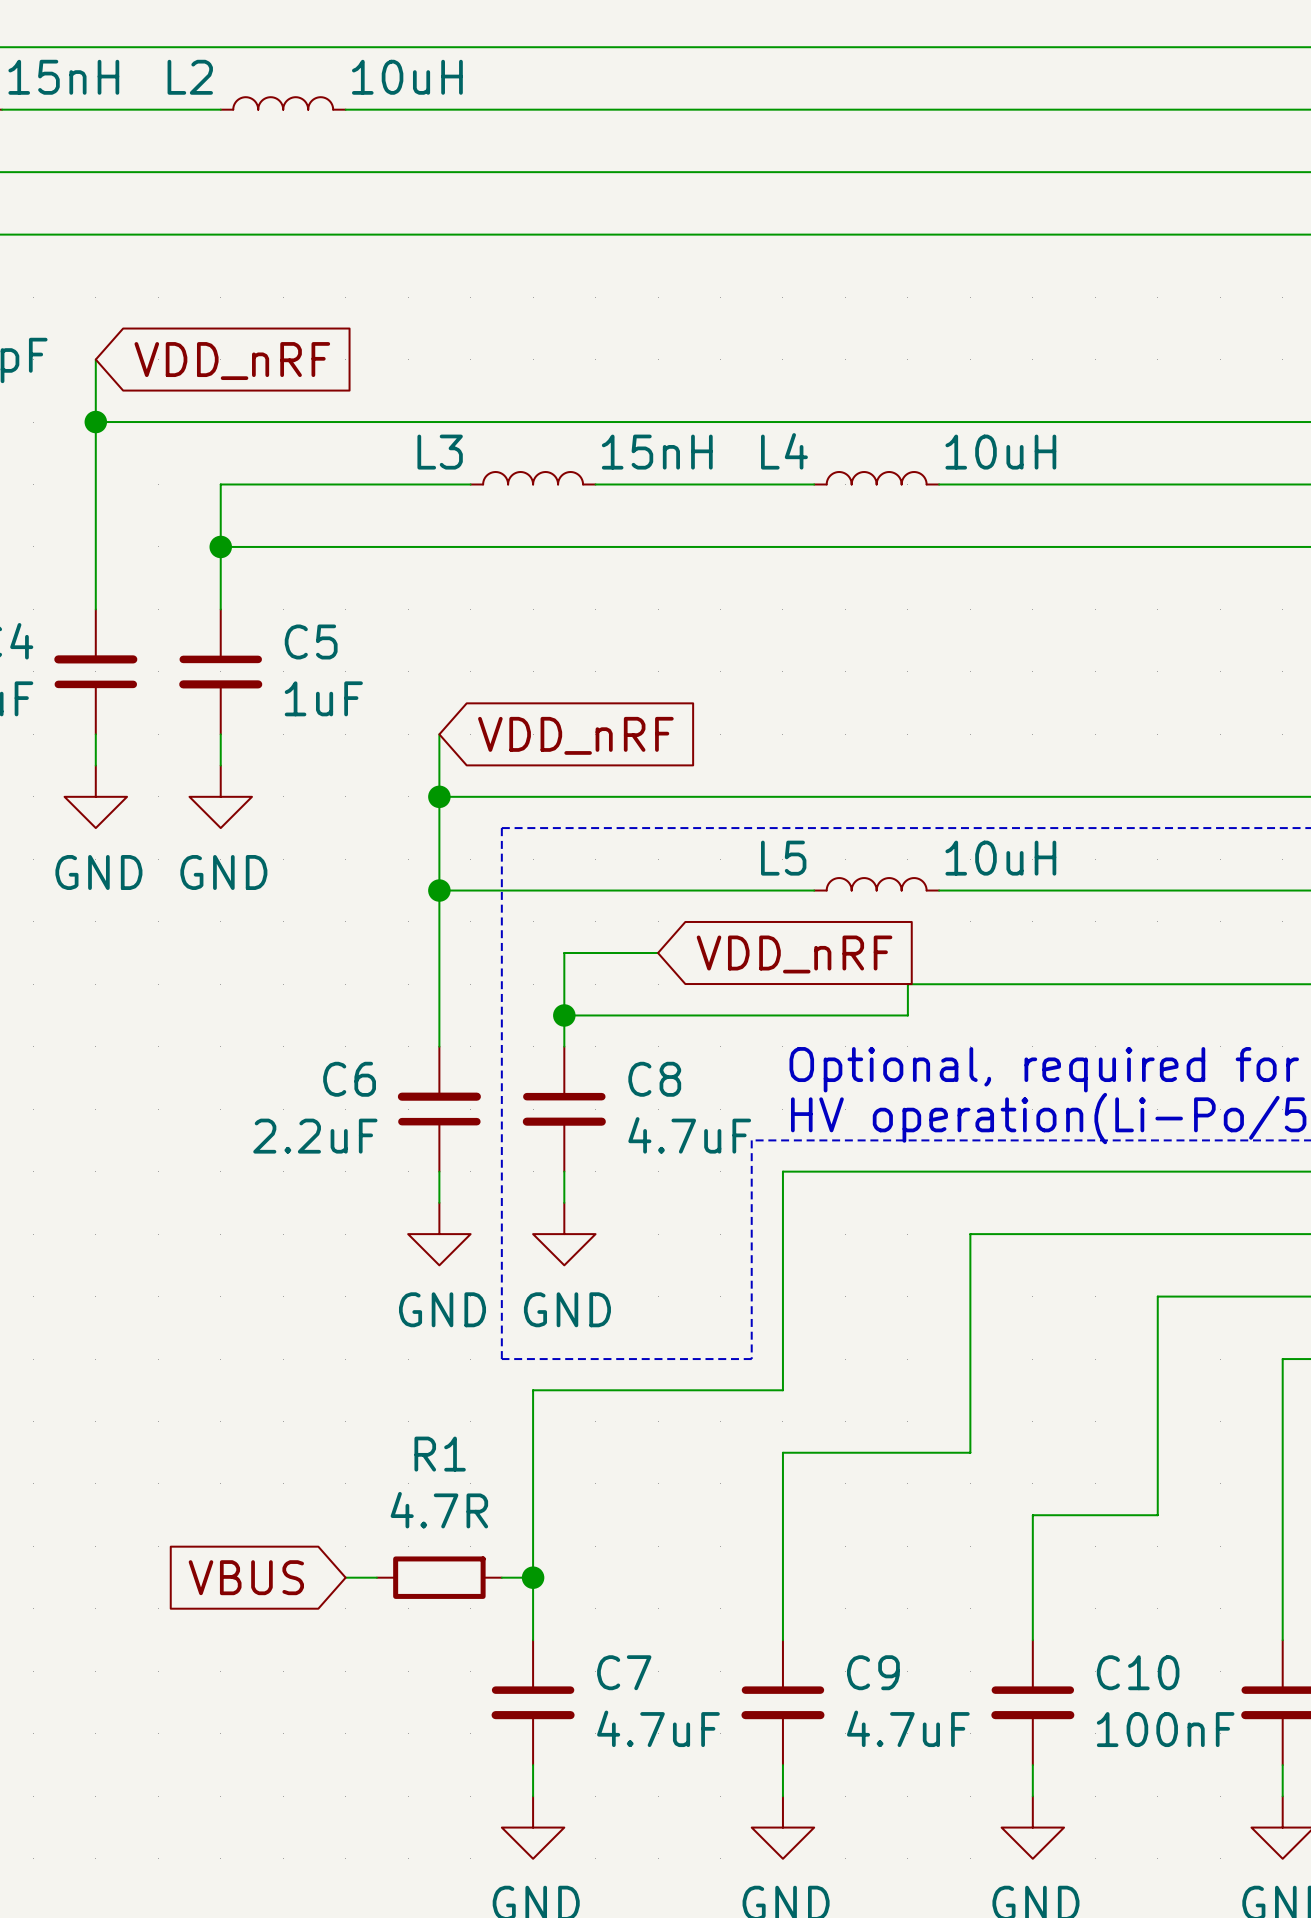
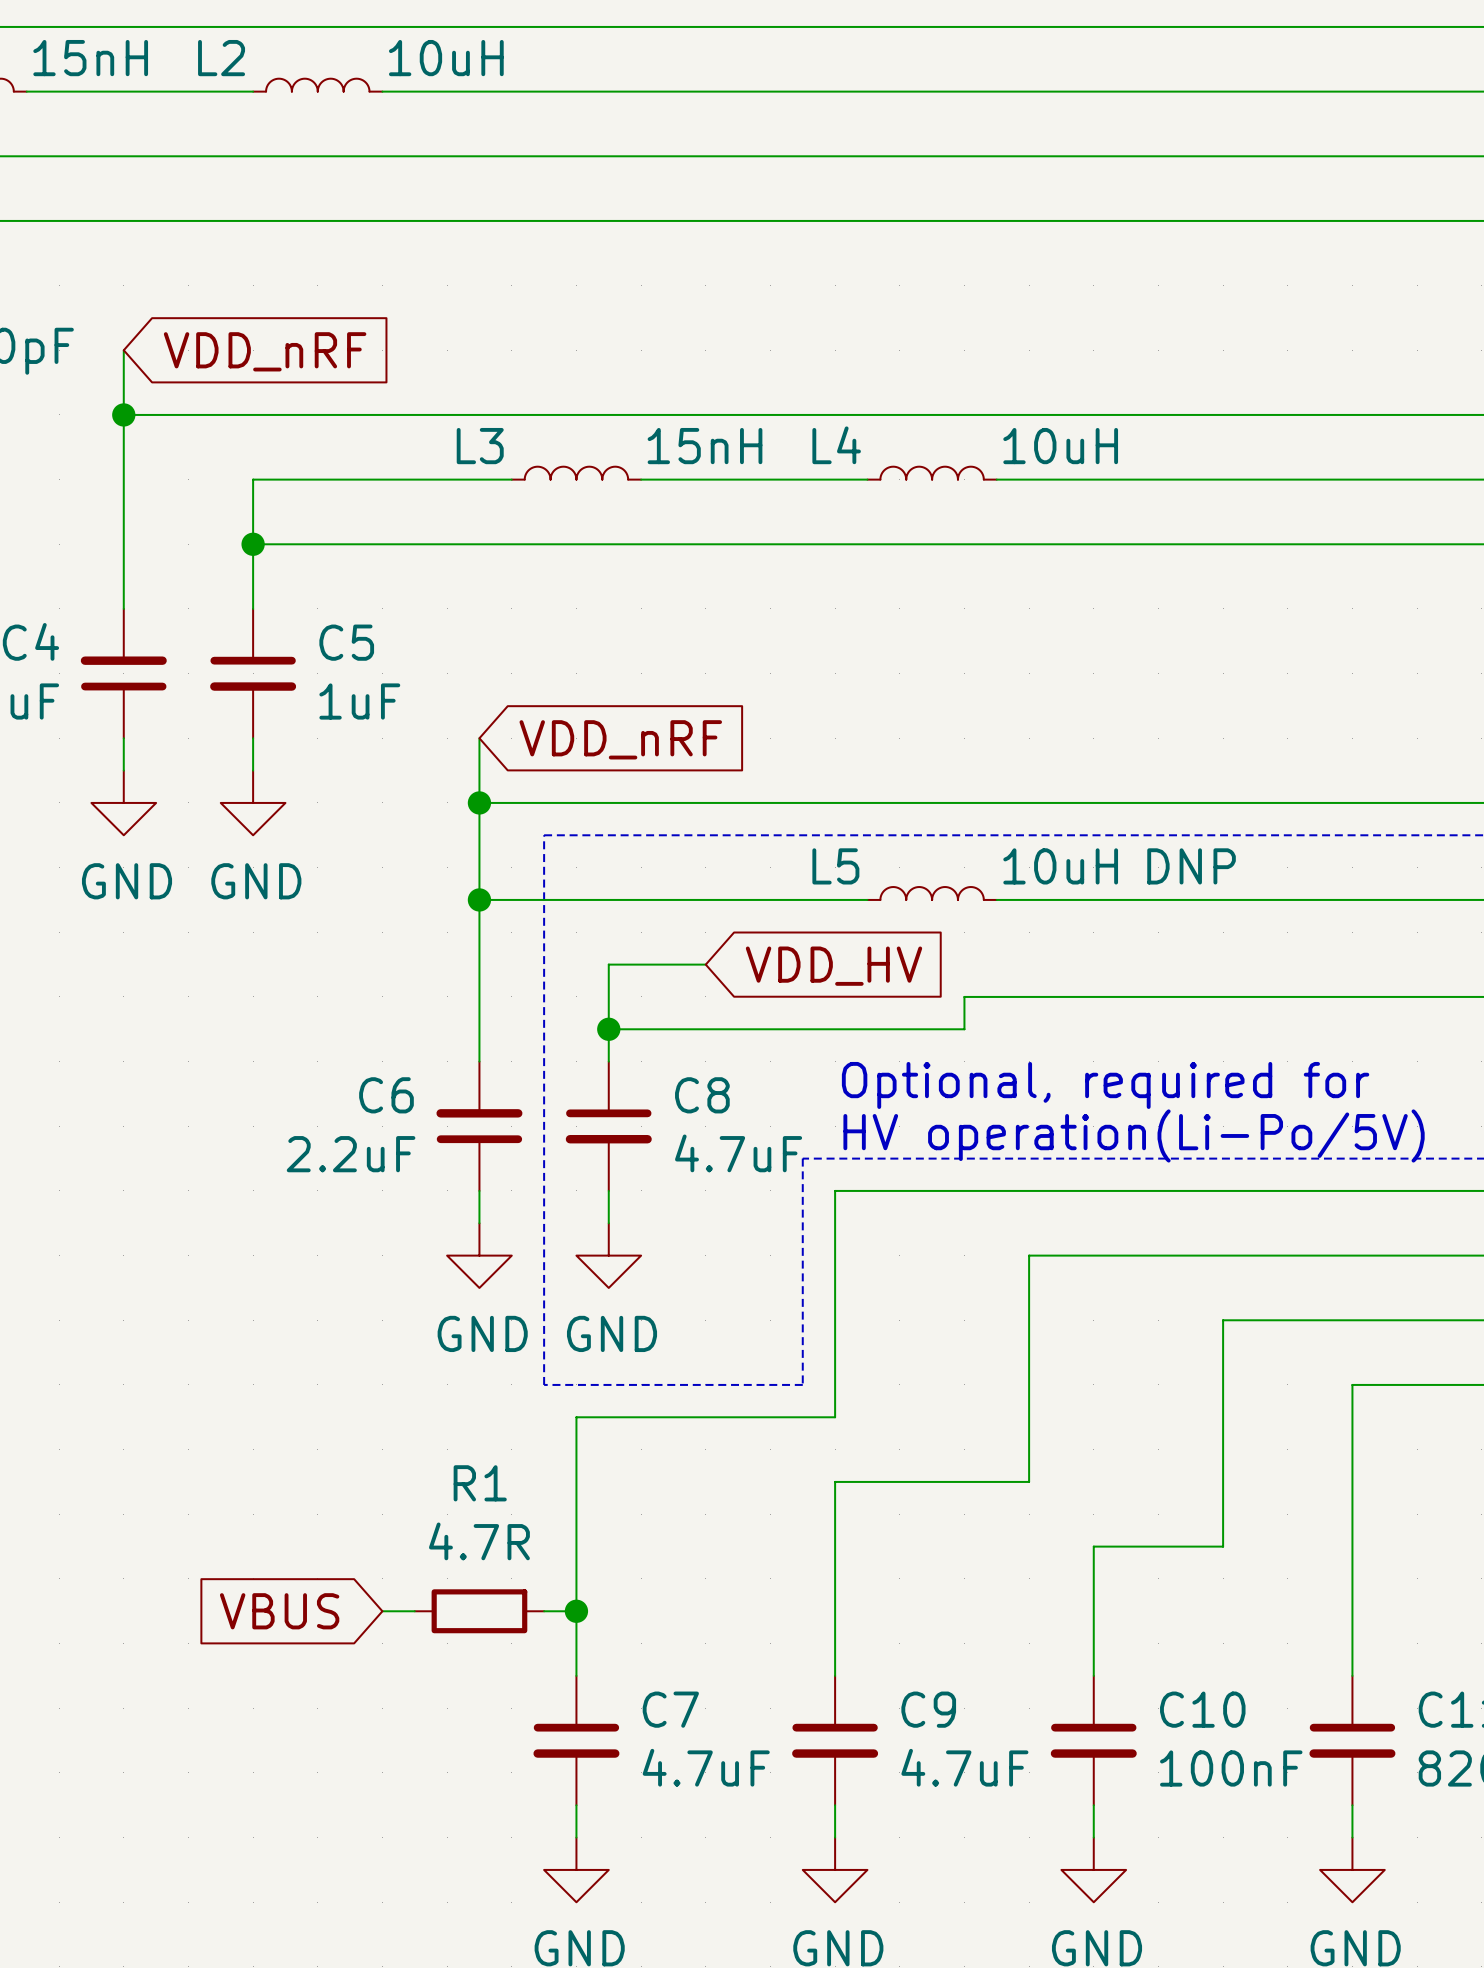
L5 text: none -> DNP (1191, 866)
global label: VDD_nRF (794, 954) -> VDD_HV (834, 966)

